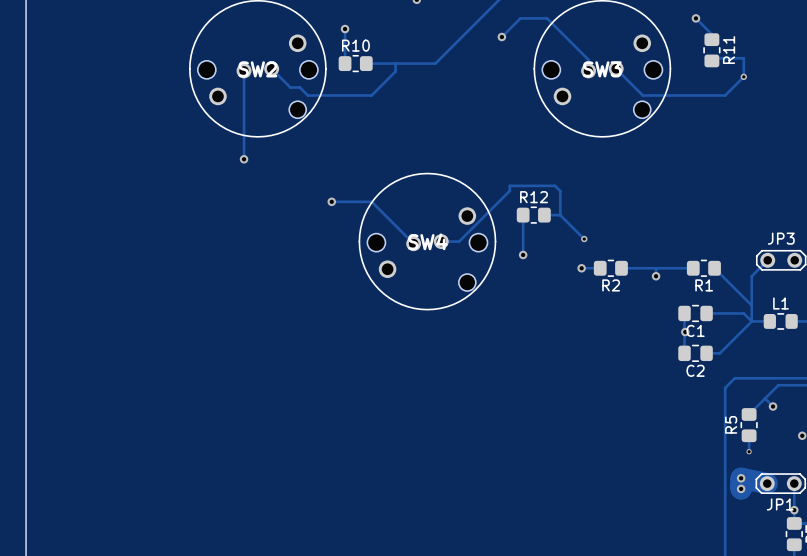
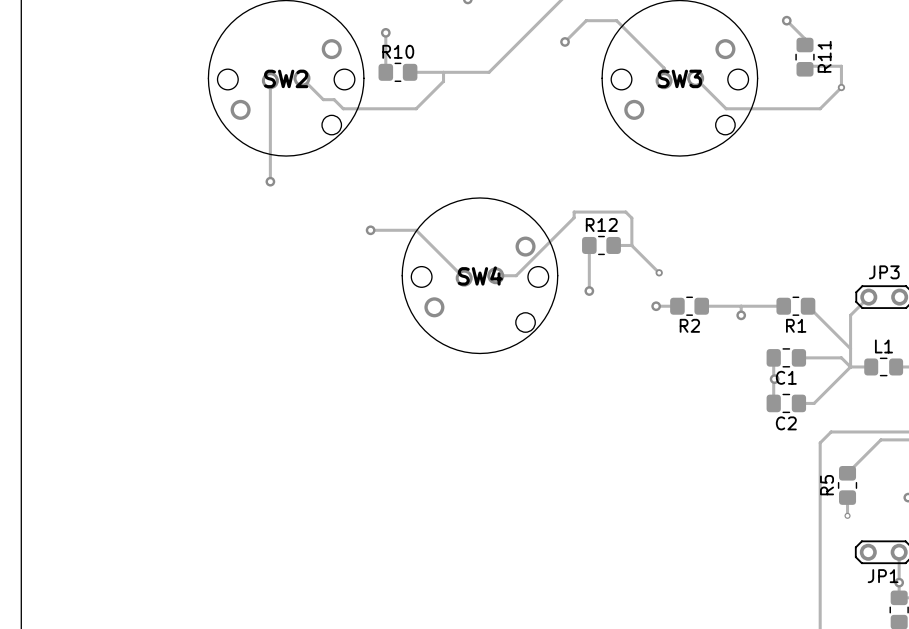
track: (765, 398) (773, 406) -> none
via: (773, 406) -> none
via: (741, 478) -> none
track: (767, 483) (741, 478) (741, 488) -> none
via: (741, 488) -> none

